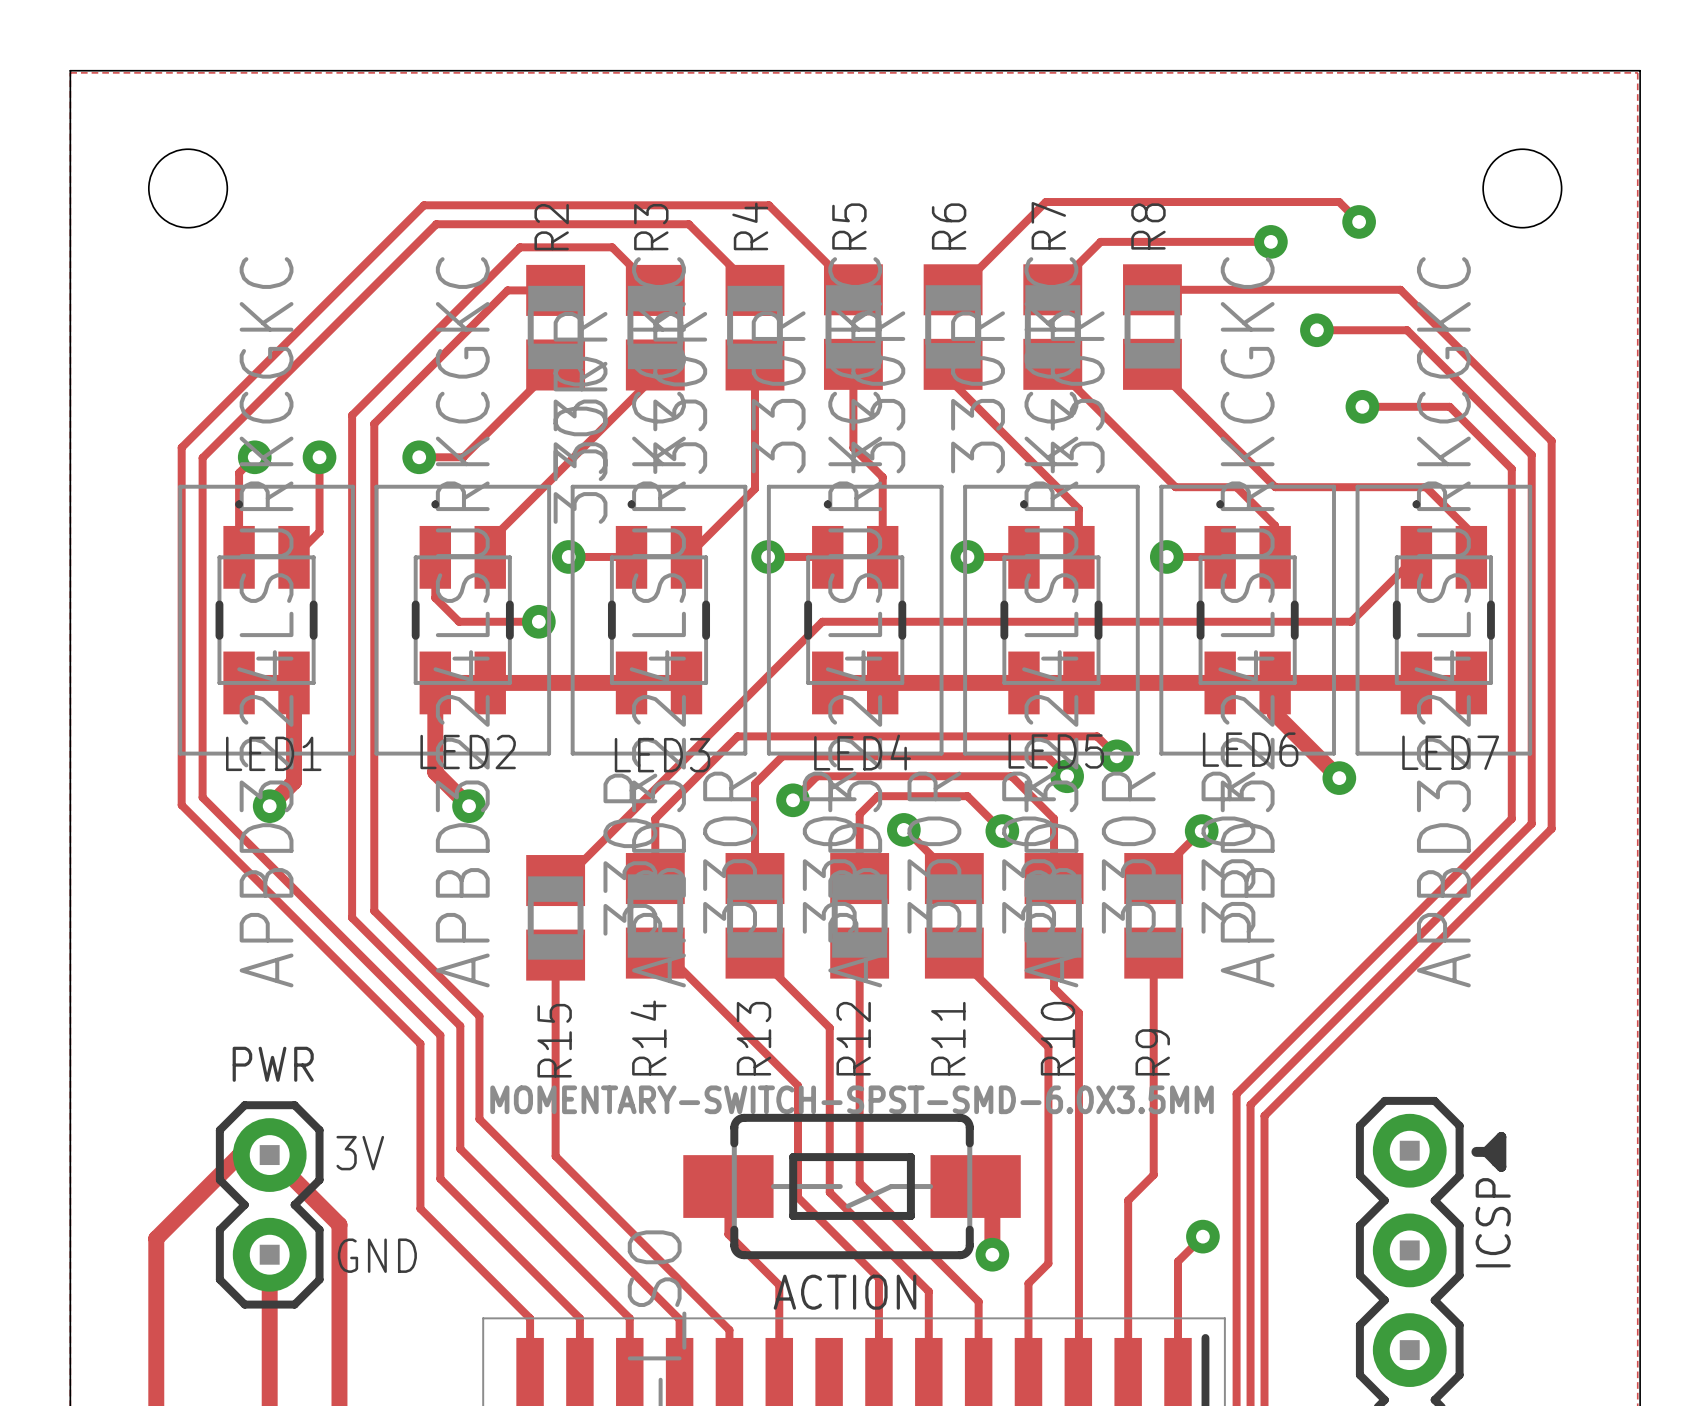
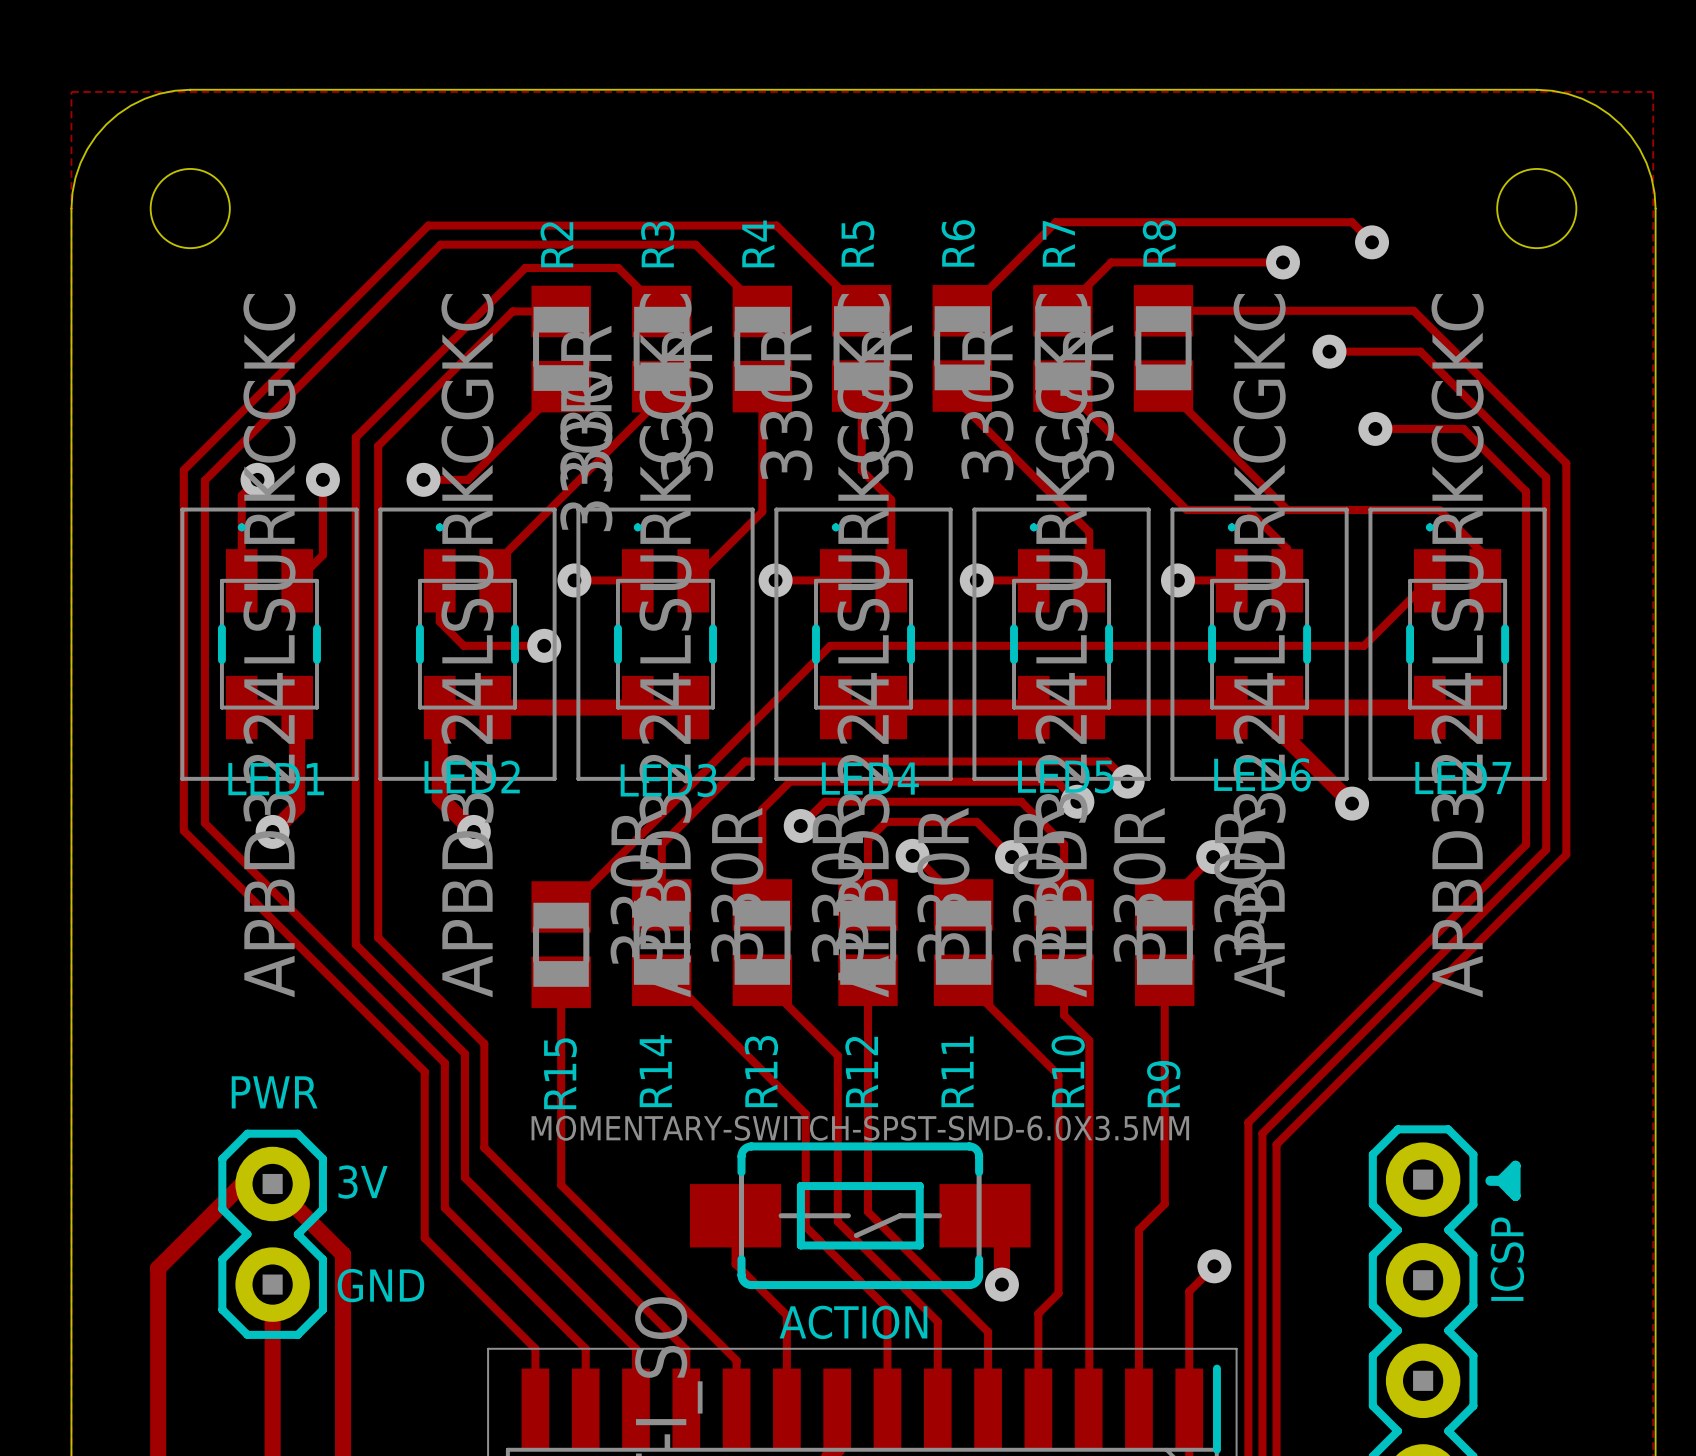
board edge: (188, 70) (70, 70) (70, 188) -> (190, 89) (159, 93) (144, 98) (117, 114) (106, 124) (96, 136) (80, 163) (75, 177) (71, 208)
board edge: (1522, 70) (1640, 70) (1640, 188) -> (1536, 89) (1567, 93) (1582, 98) (1609, 114) (1620, 124) (1631, 136) (1646, 163) (1651, 177) (1655, 208)

